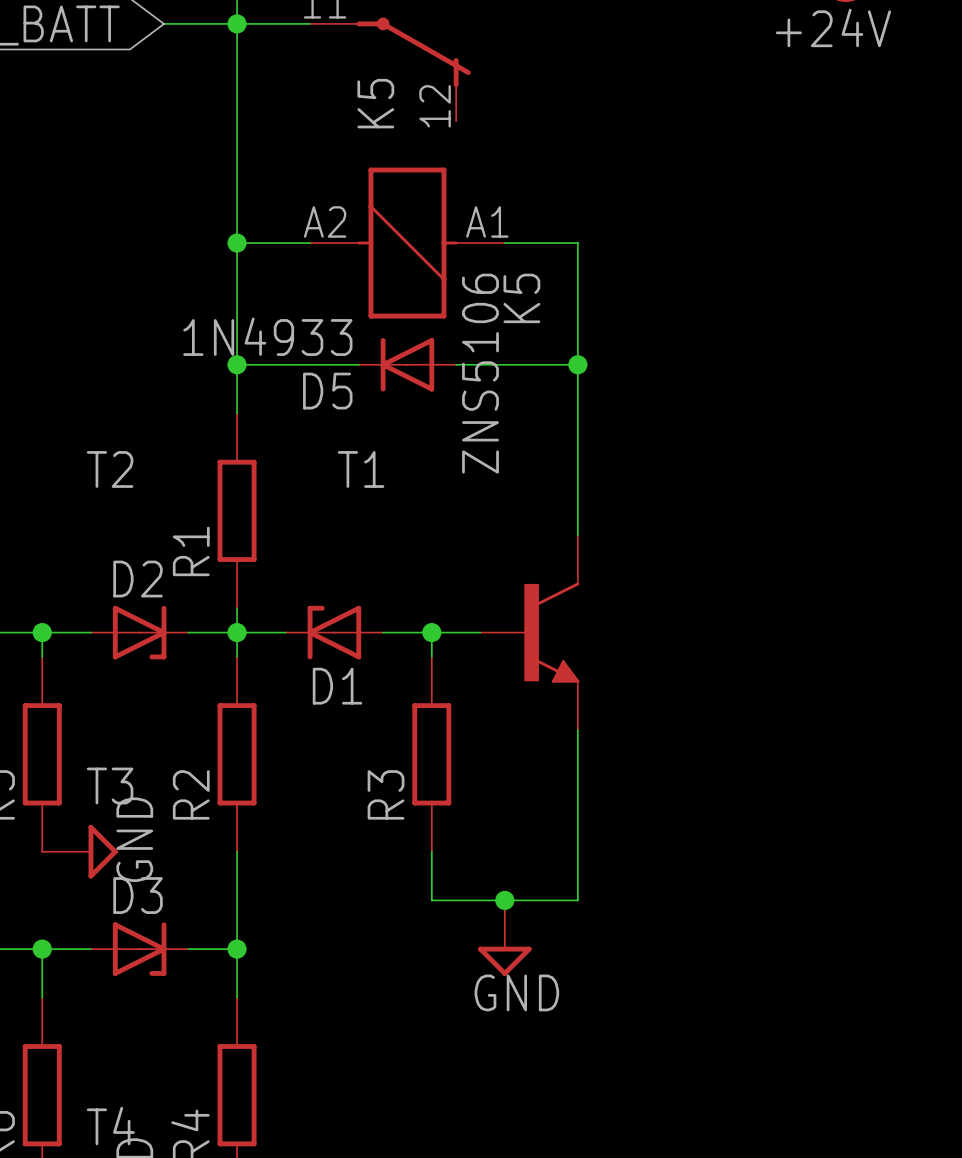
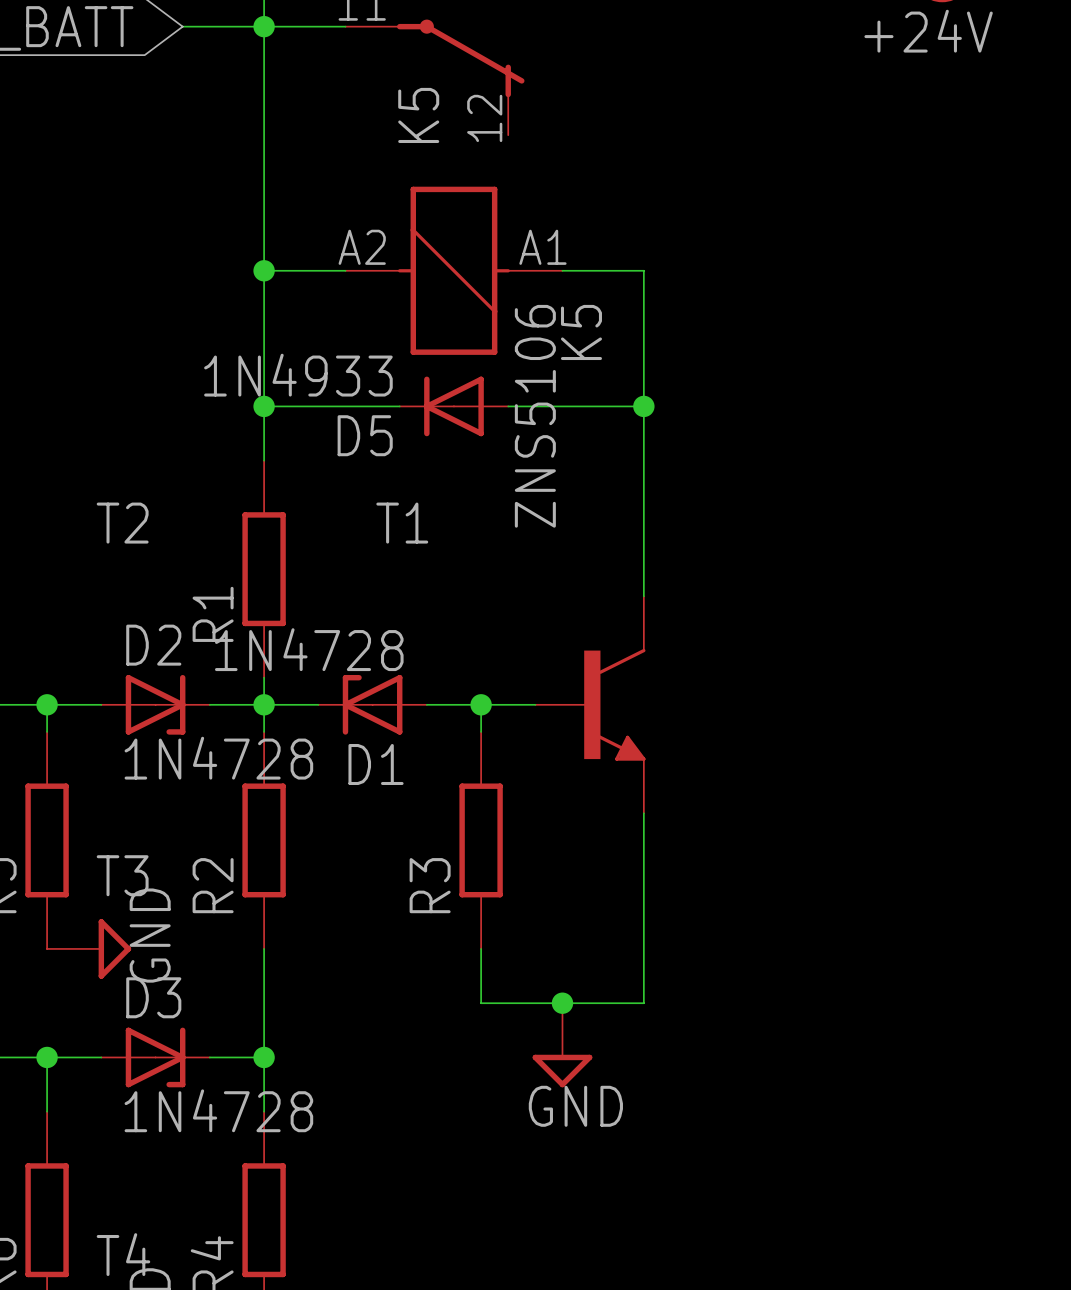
D1 value: none -> 1N4728 (309, 649)
D2 value: none -> 1N4728 (218, 758)
D3 value: none -> 1N4728 (218, 1110)

